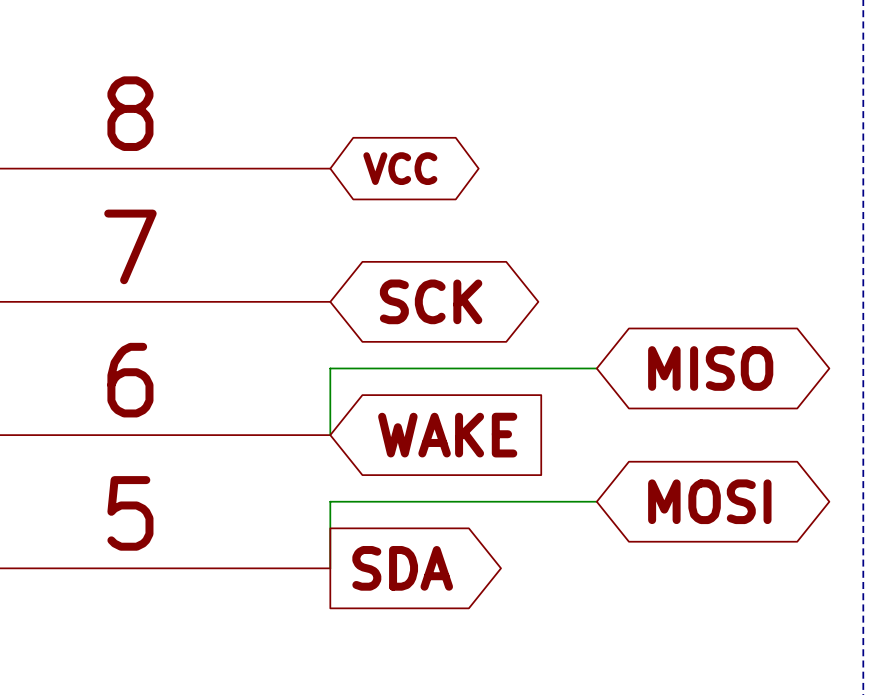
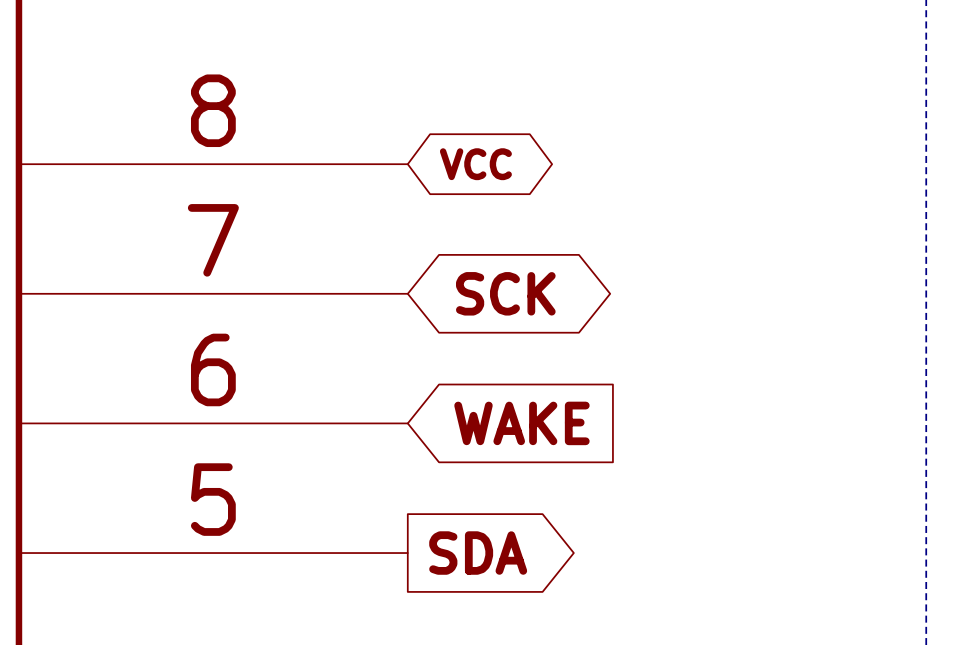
wire: (596, 368) (330, 368) (330, 435) -> none
global label: MISO (710, 368) -> none
wire: (596, 501) (330, 501) (330, 568) -> none
global label: MOSI (709, 501) -> none

